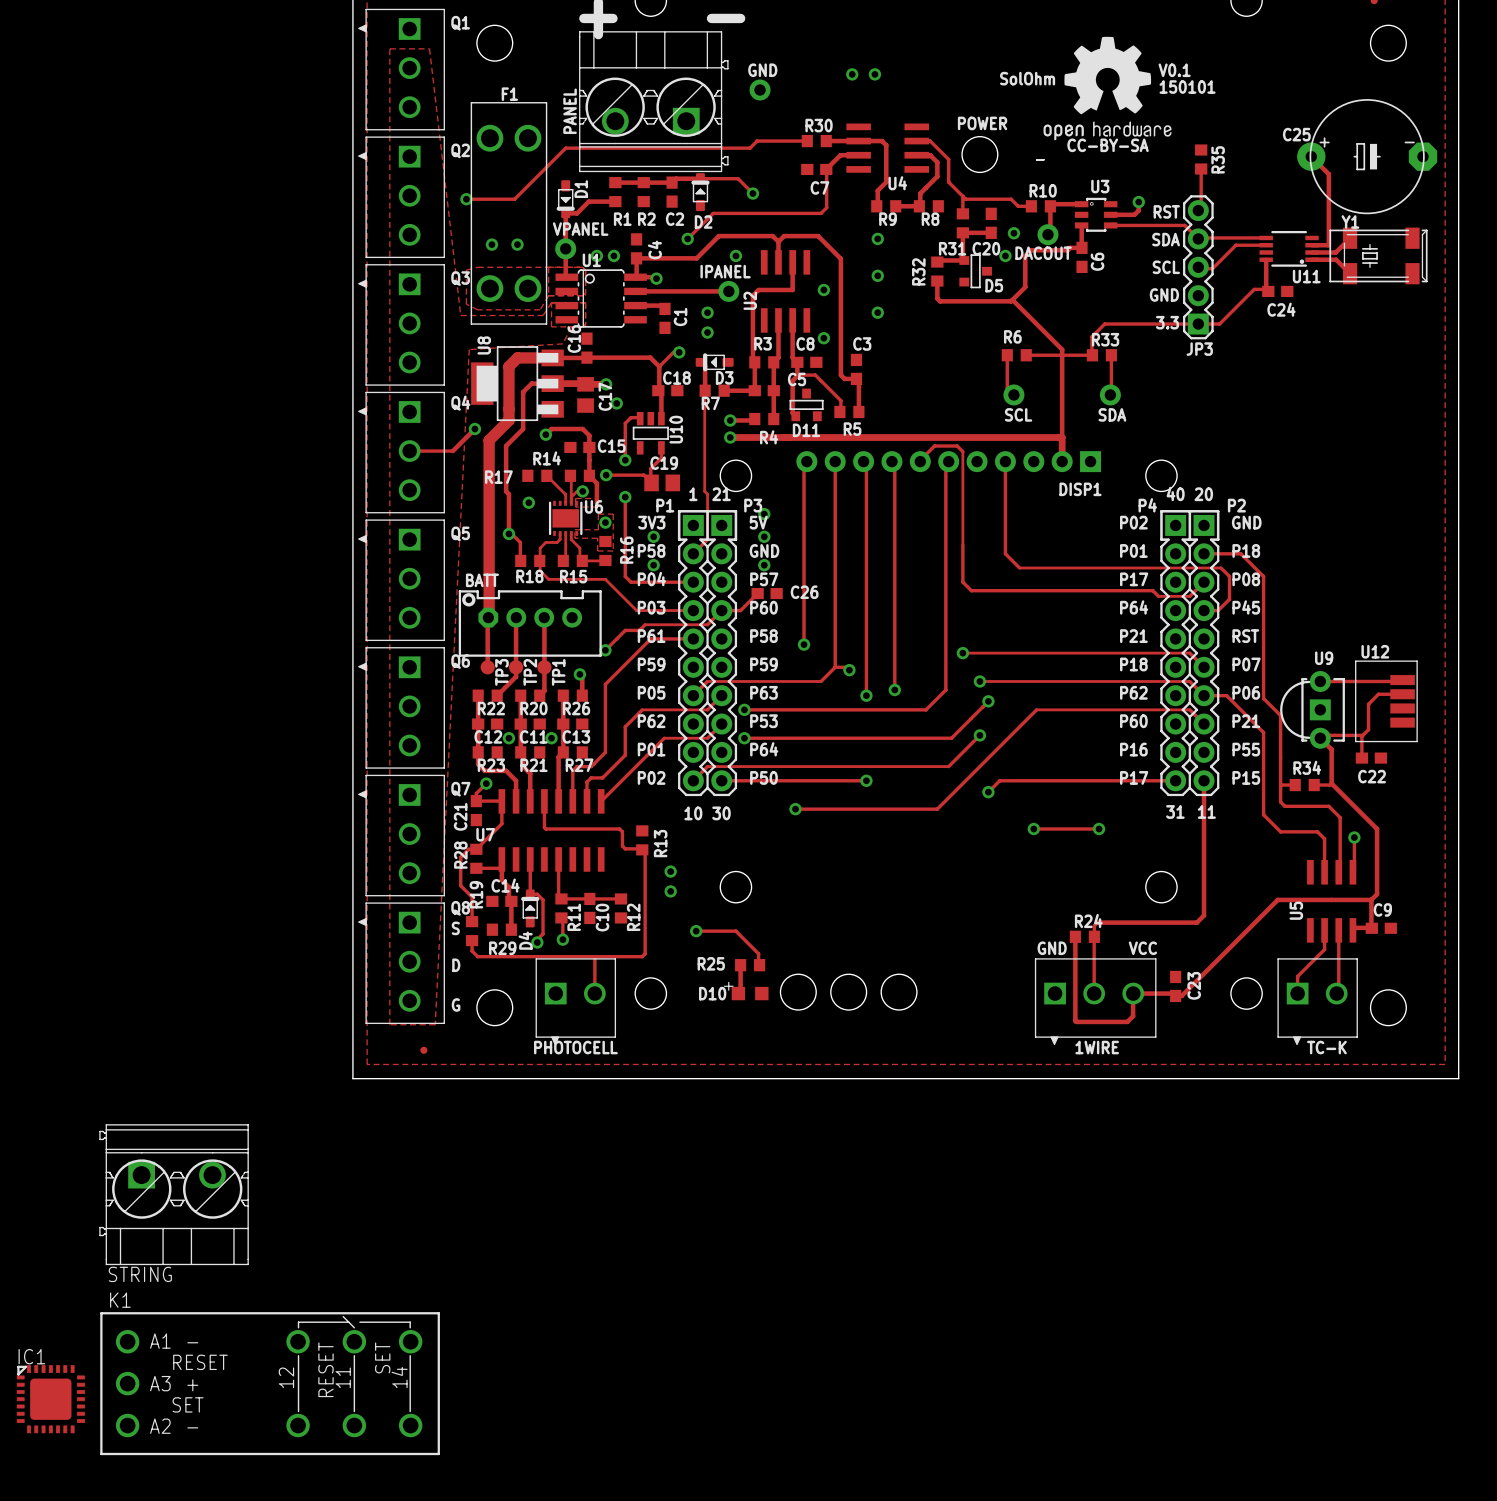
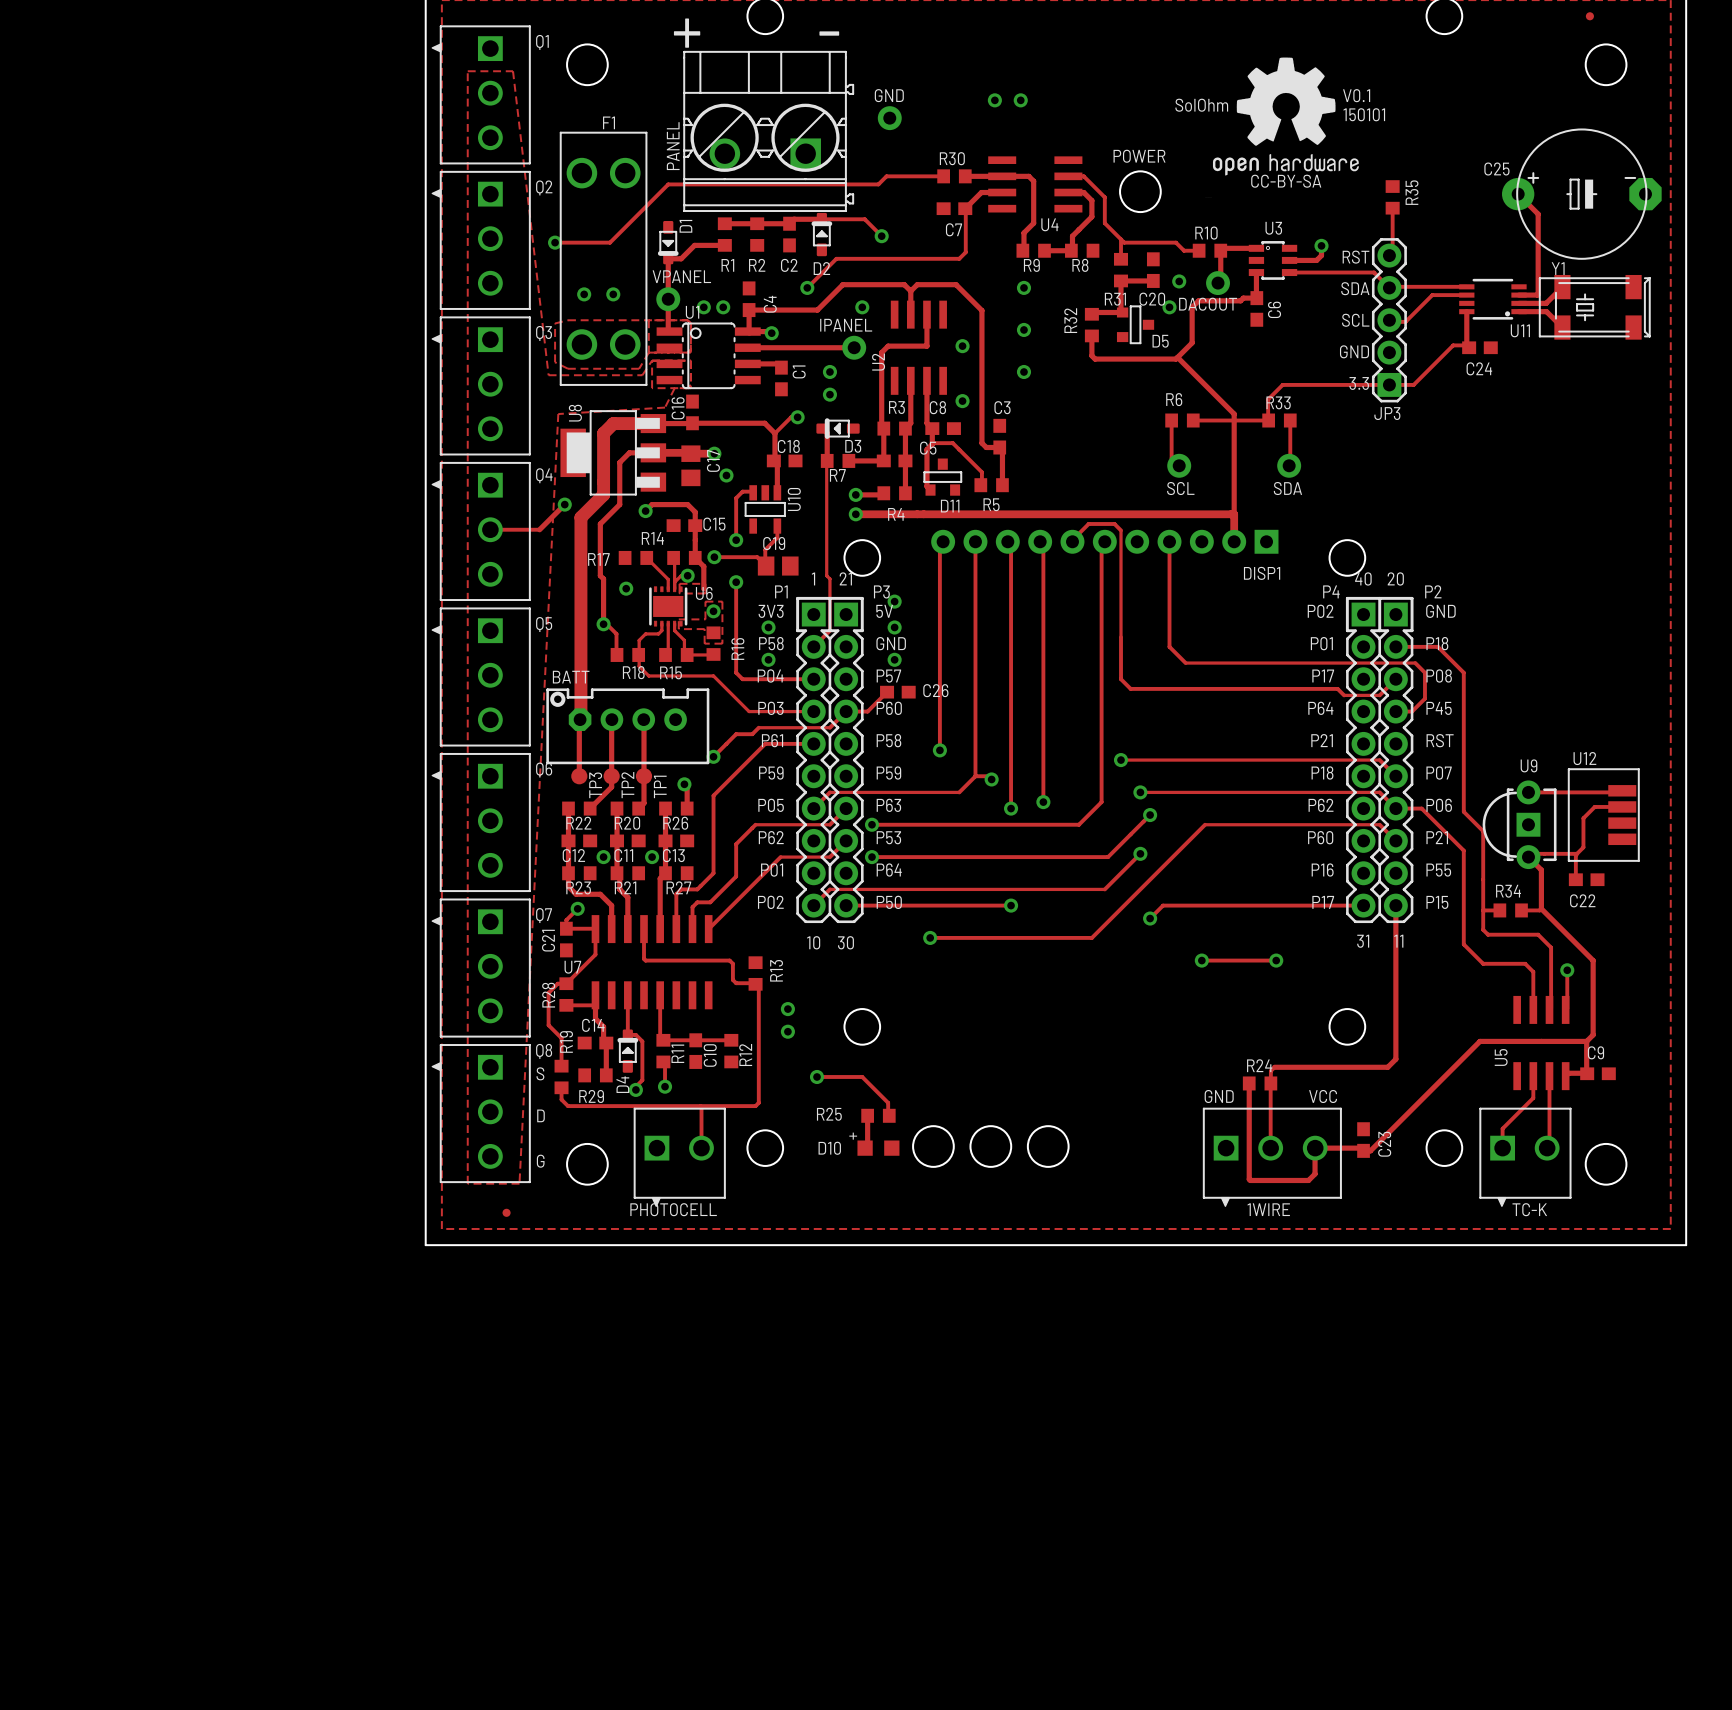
STRING: (174, 1194) -> none
K1: (270, 1383) -> none
IC1: (50, 1399) -> none

